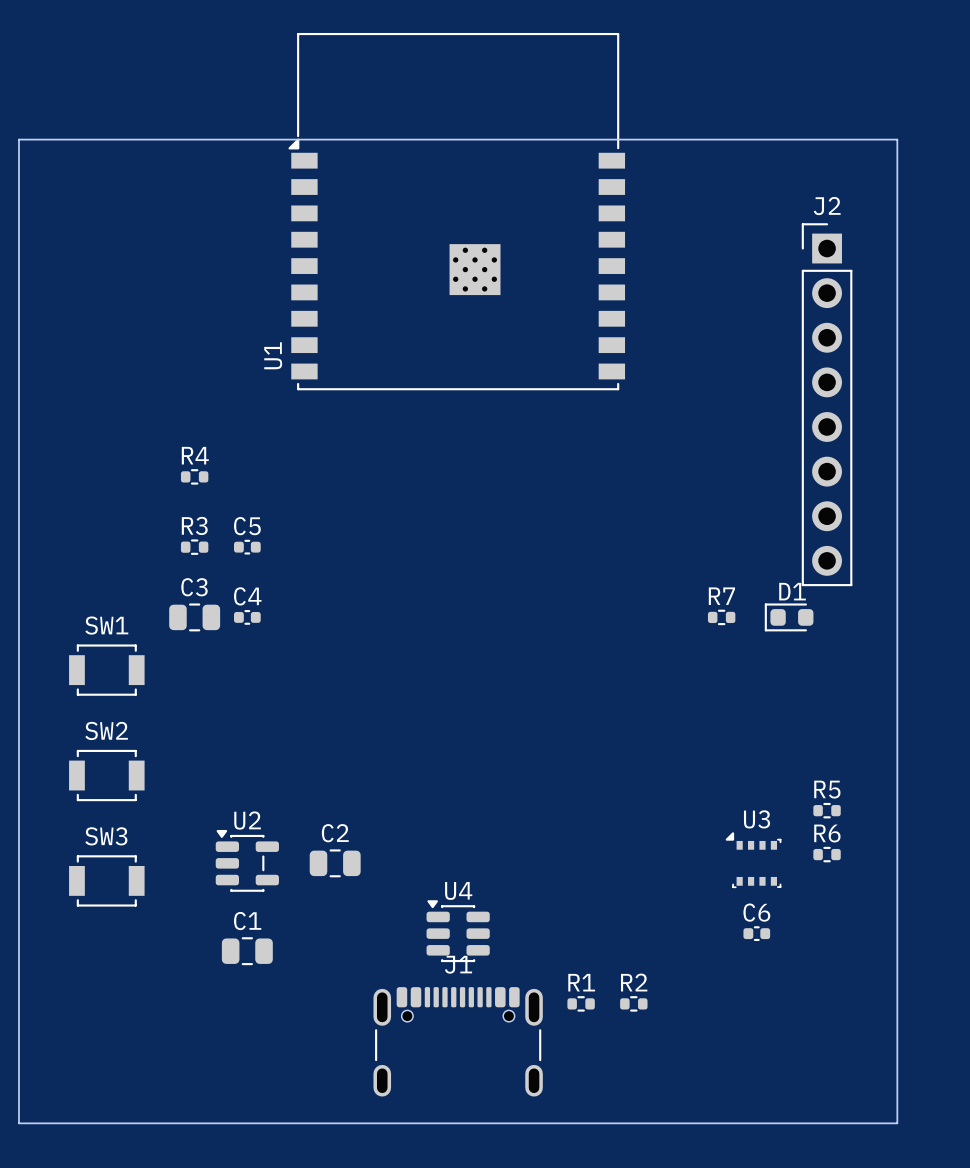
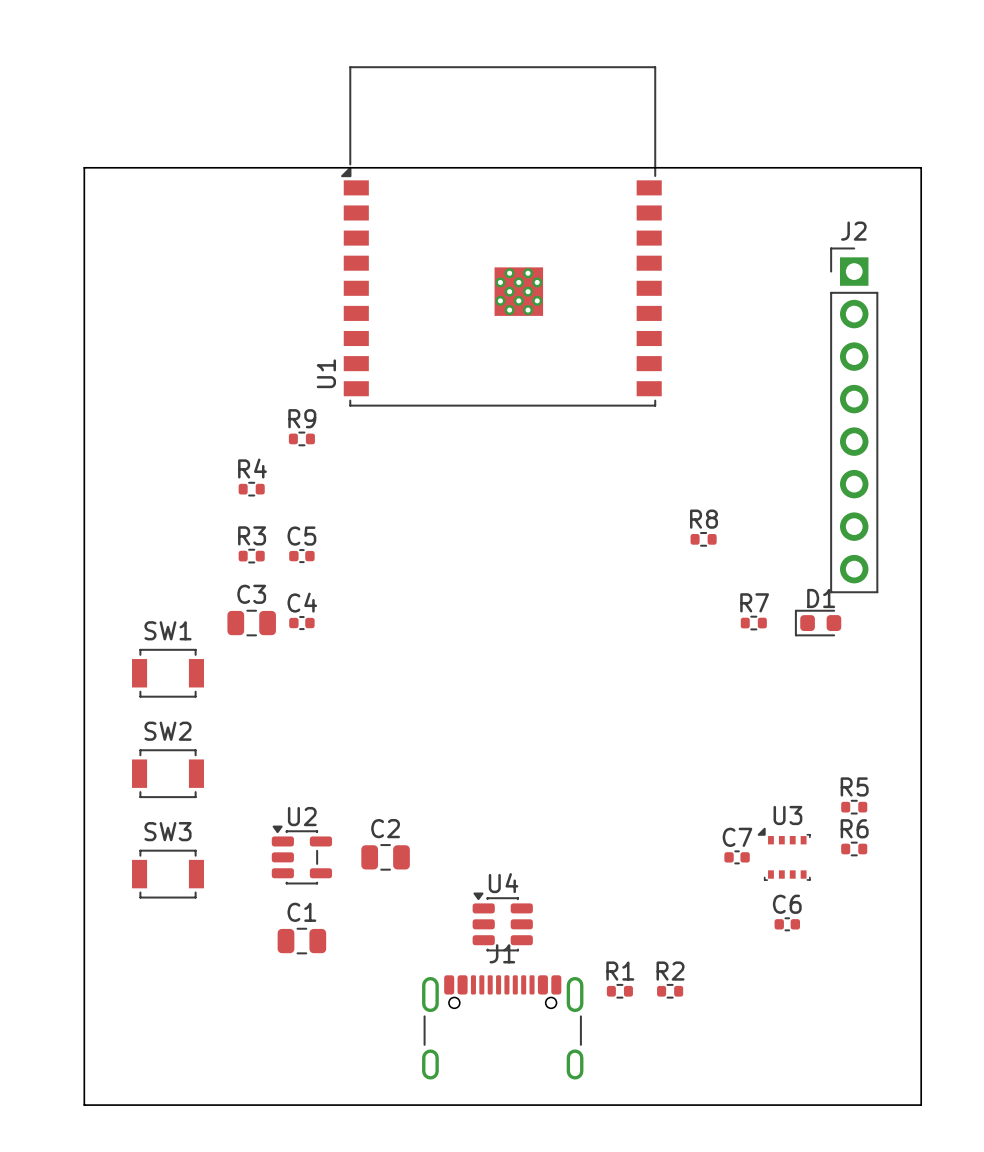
R9: none -> (301, 438)
R8: none -> (703, 539)
C7: none -> (737, 857)

